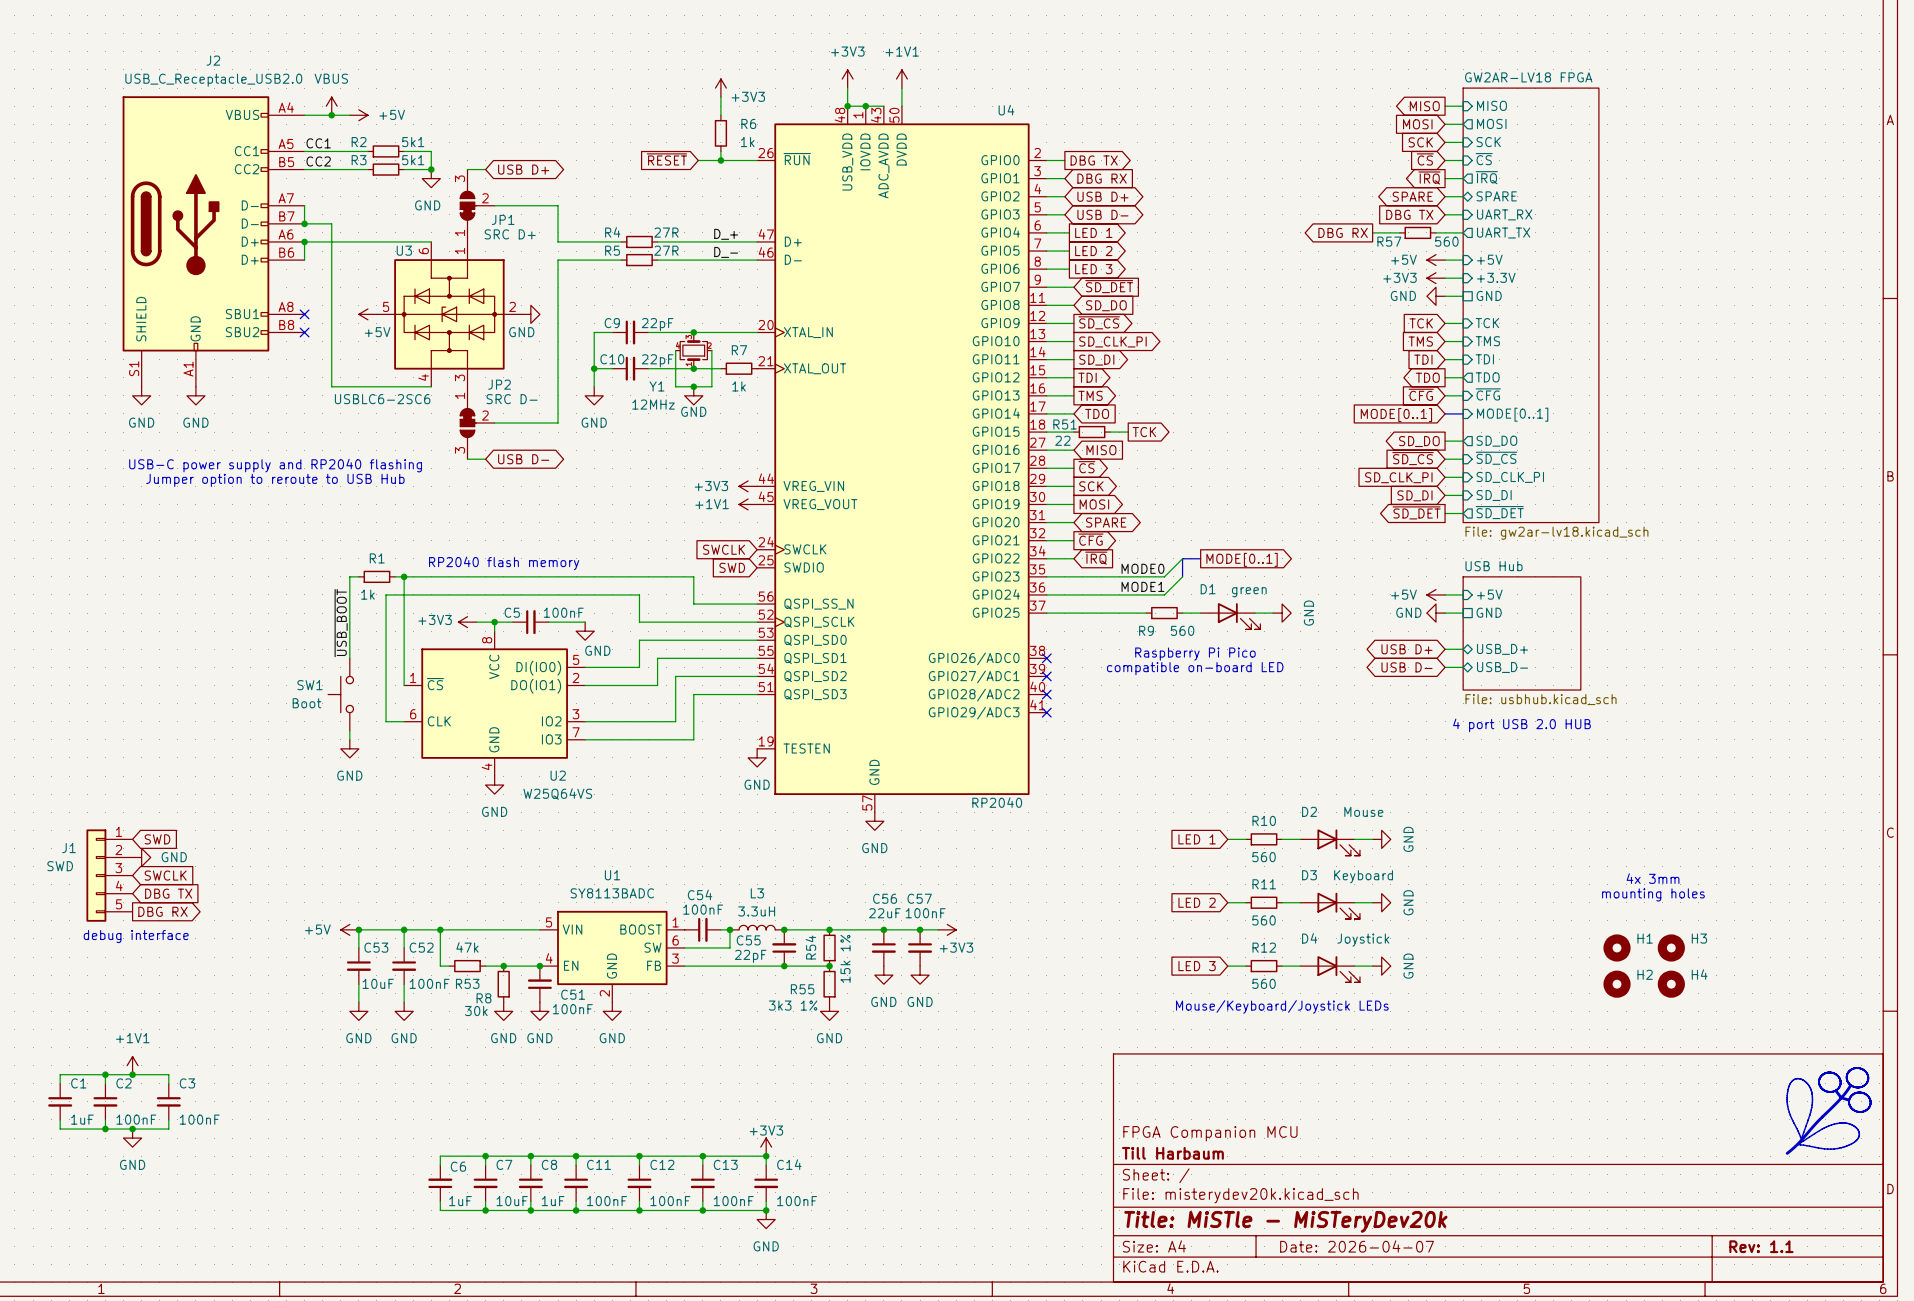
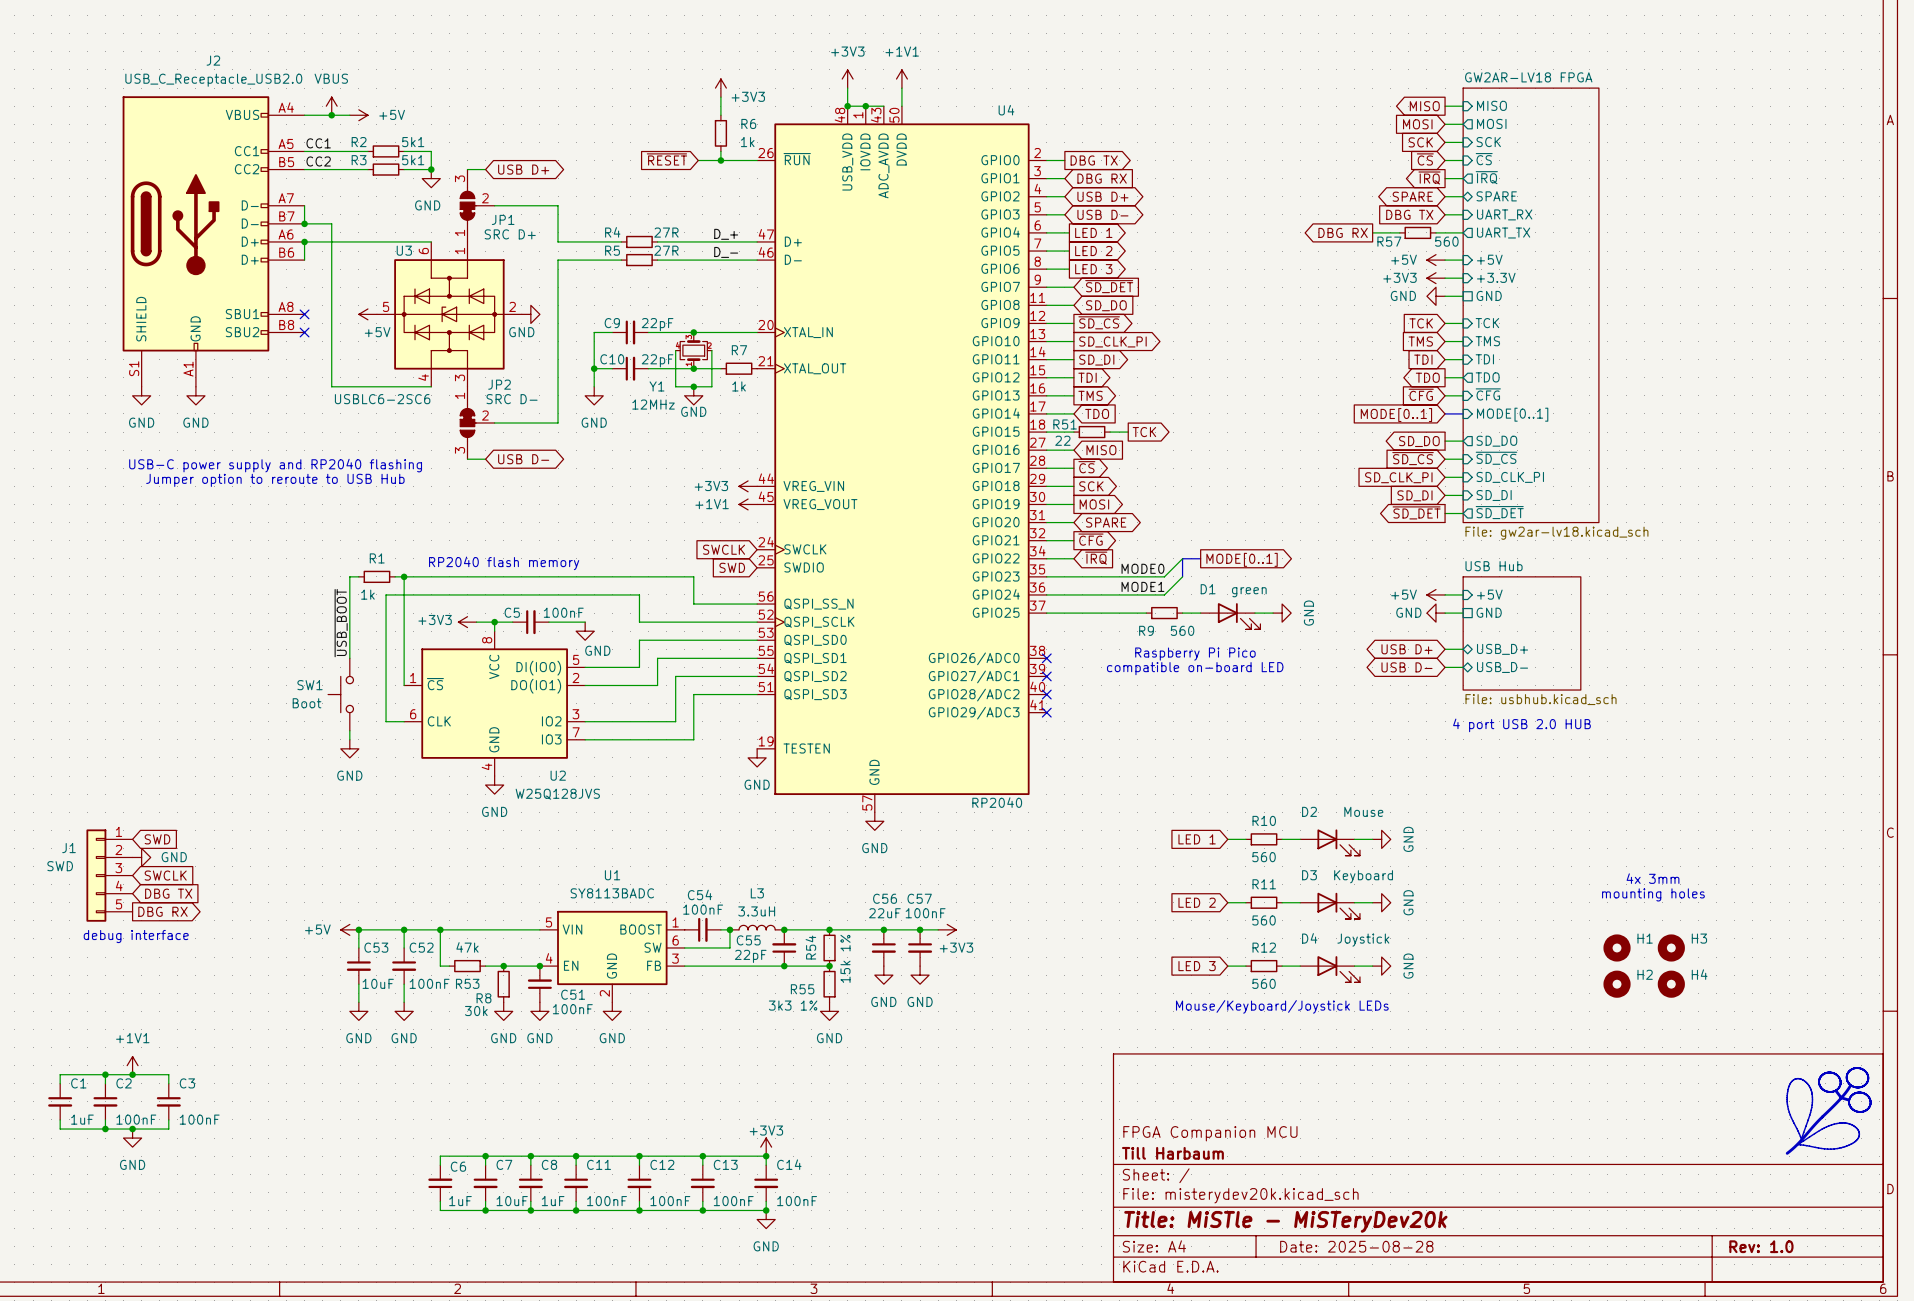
U2 value: W25Q64VS (557, 793) -> W25Q128JVS (557, 794)
title block: Date: 2026-04-07 (1357, 1246) -> Date: 2025-08-28 (1356, 1246)
title block: Rev: 1.1 (1761, 1246) -> Rev: 1.0 (1761, 1246)

